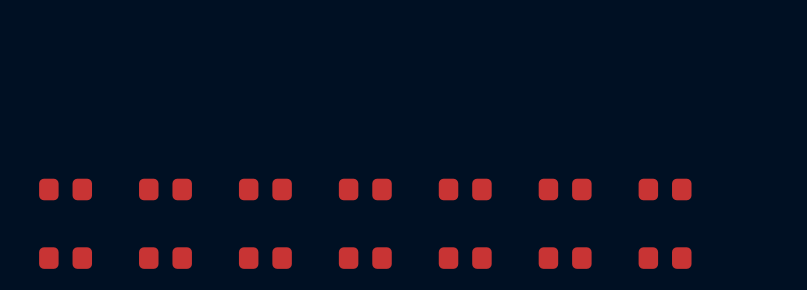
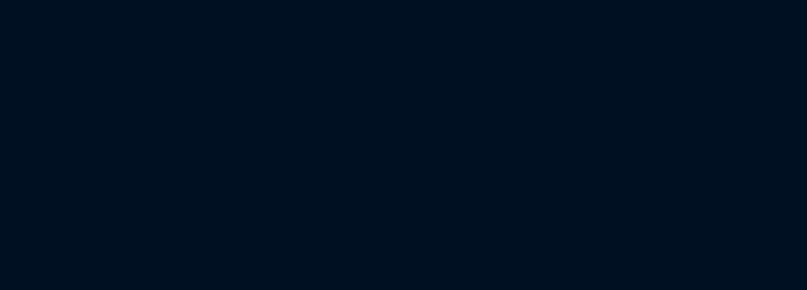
part: (65, 189) -> none
part: (165, 189) -> none
part: (265, 189) -> none
part: (365, 189) -> none
part: (465, 189) -> none
part: (565, 189) -> none
part: (665, 189) -> none
part: (65, 258) -> none
part: (165, 258) -> none
part: (265, 258) -> none
part: (365, 258) -> none
part: (465, 258) -> none
part: (565, 258) -> none
part: (665, 258) -> none

